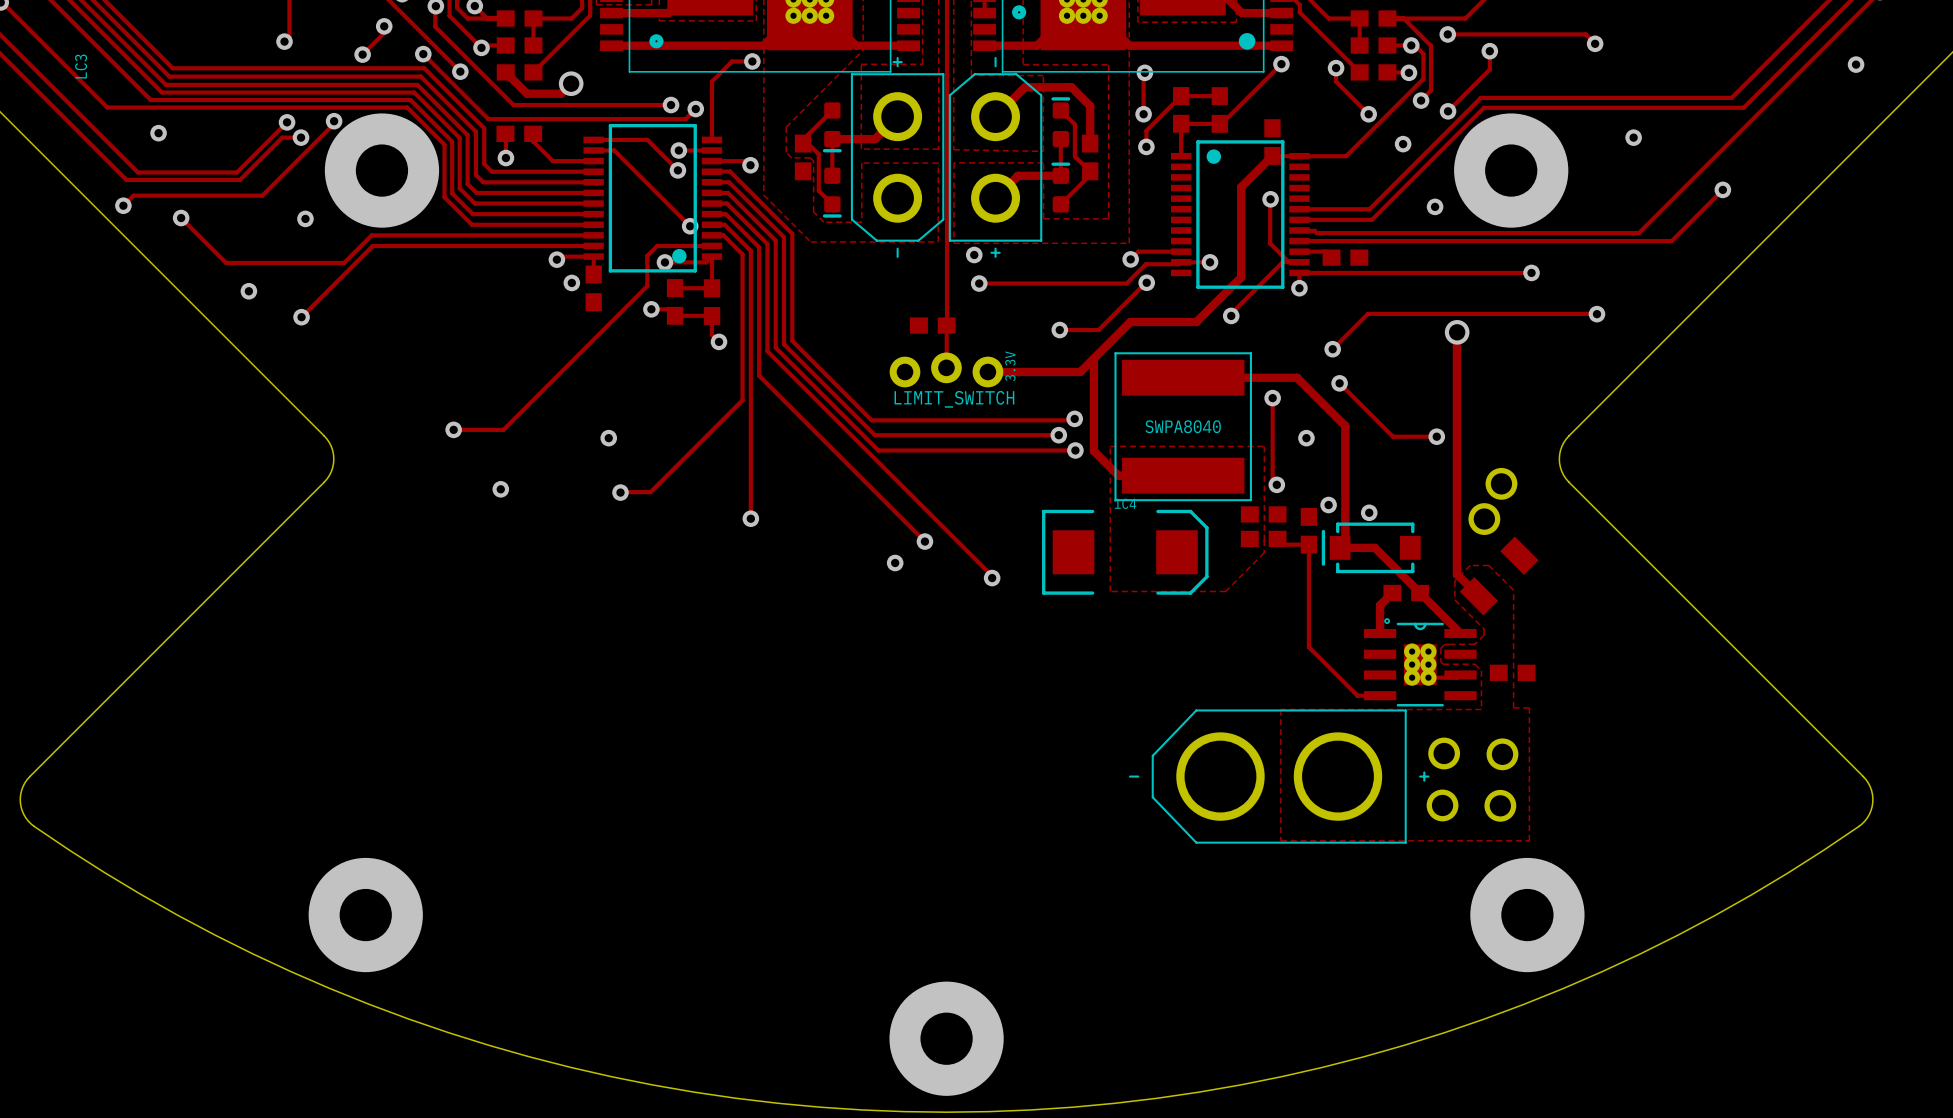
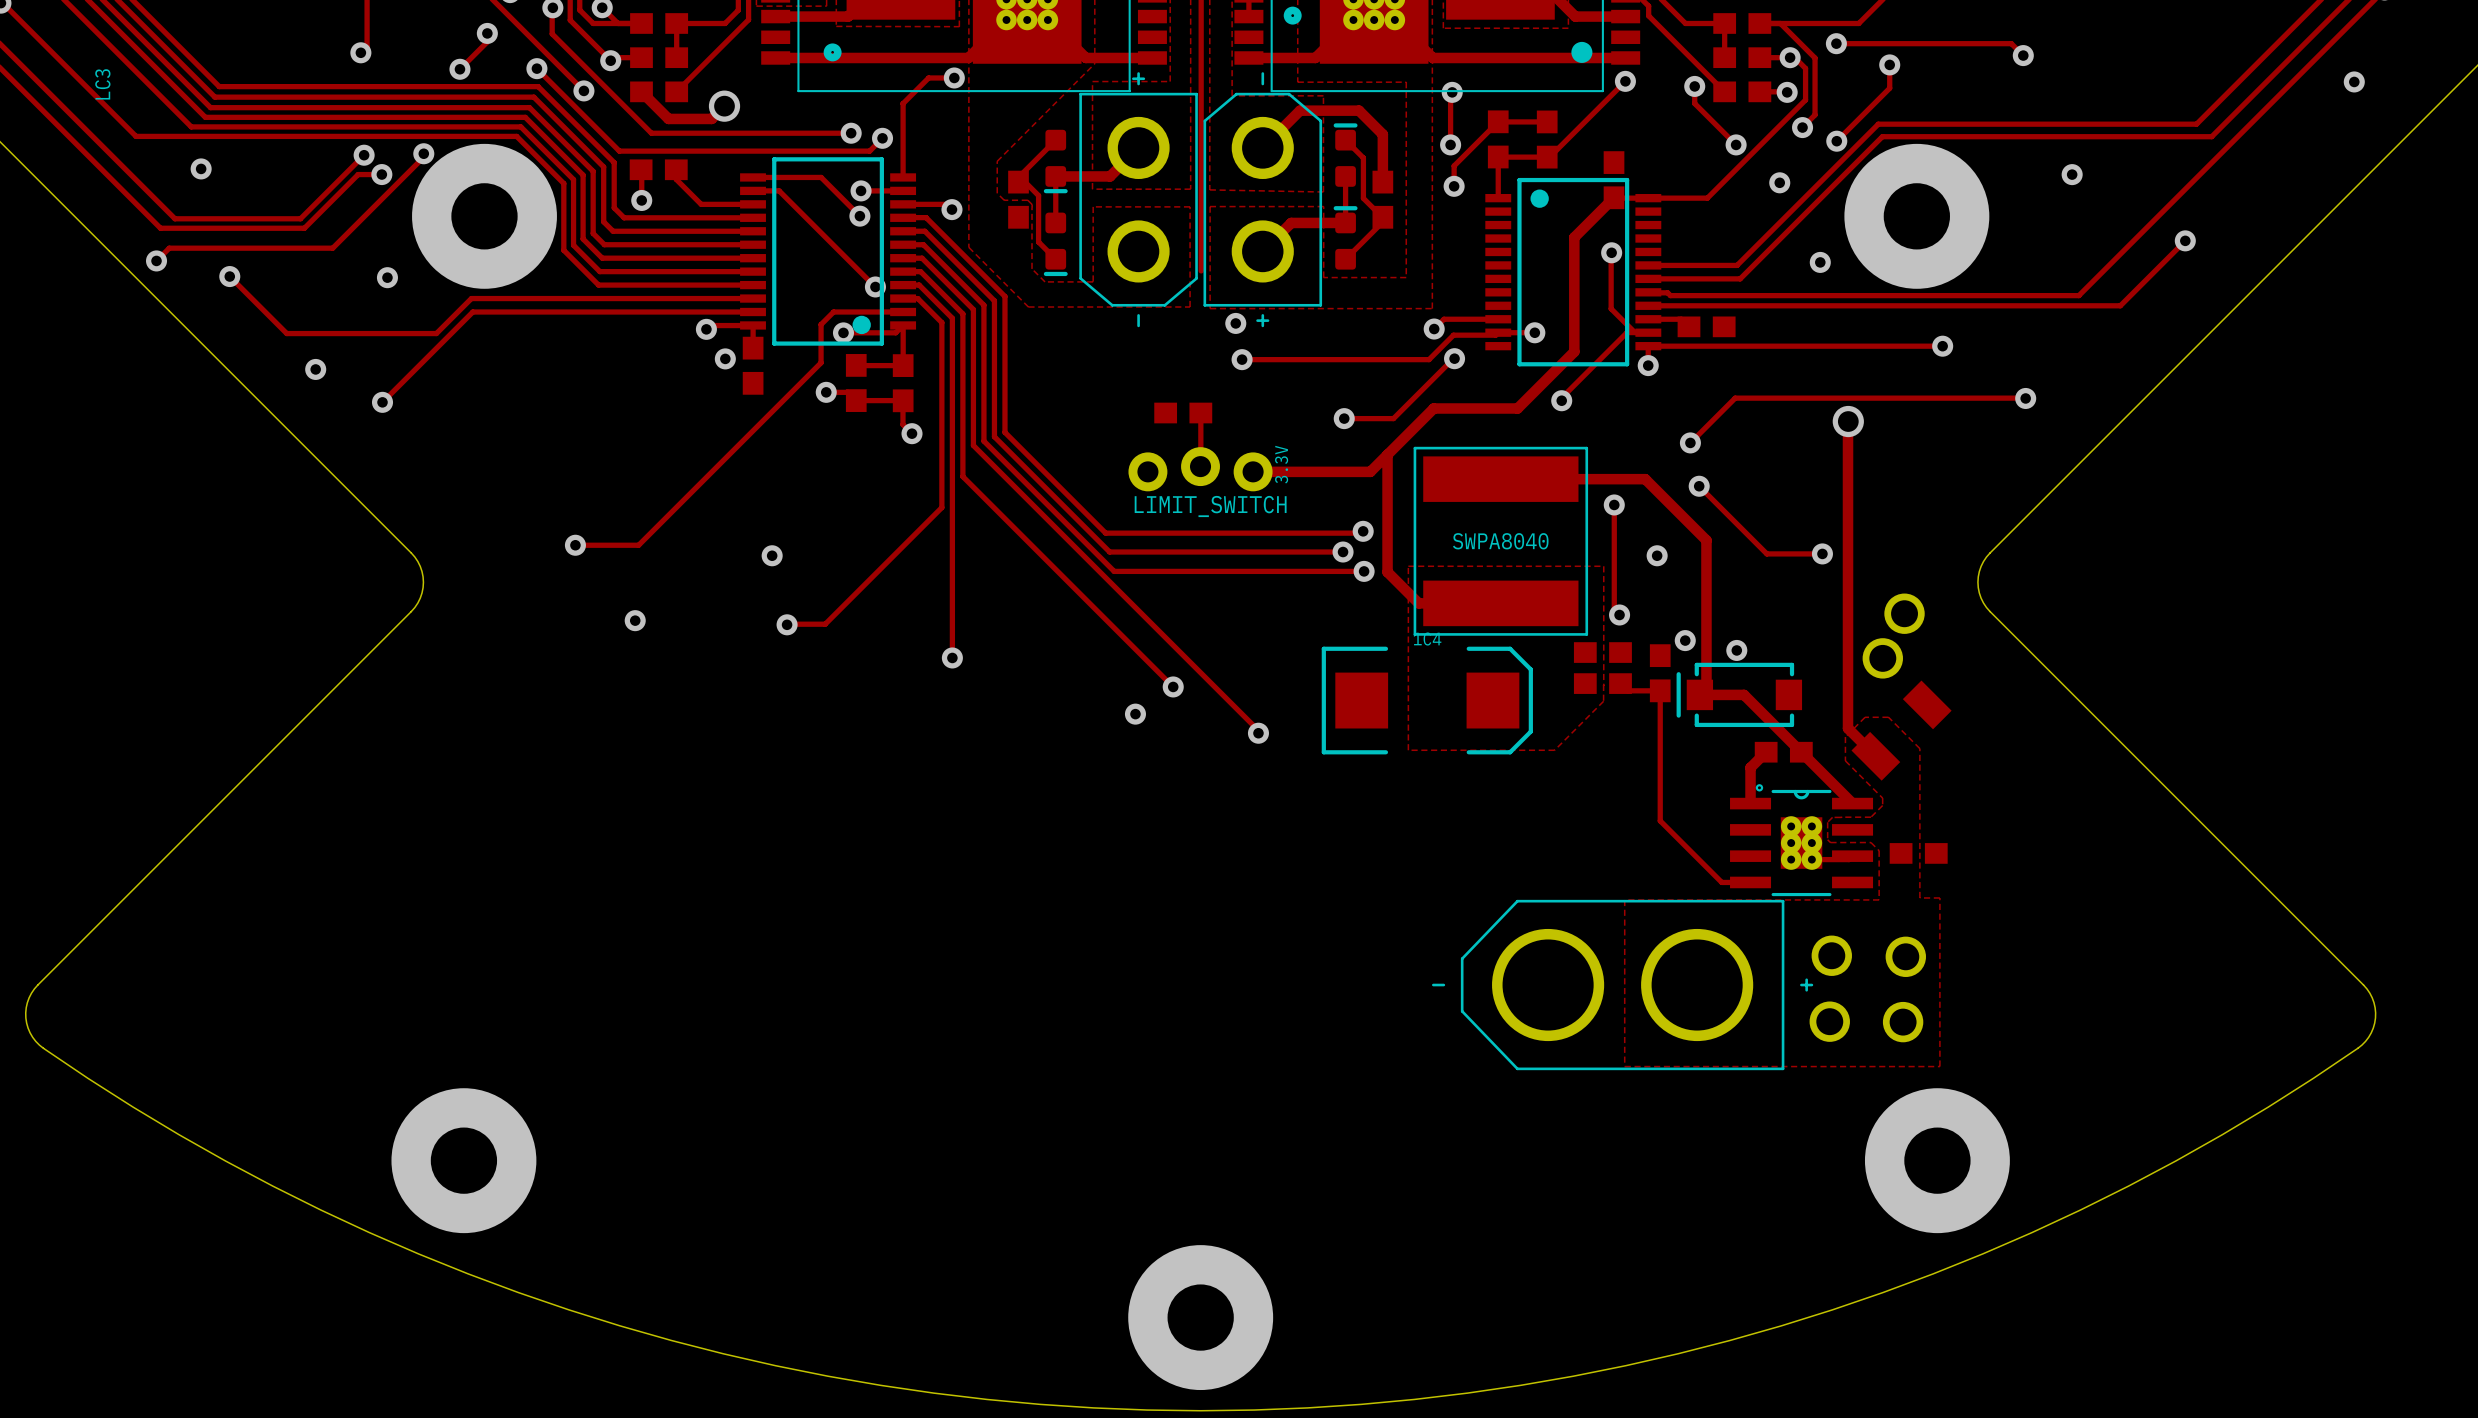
track: (946, 213) (946, 328) -> none

